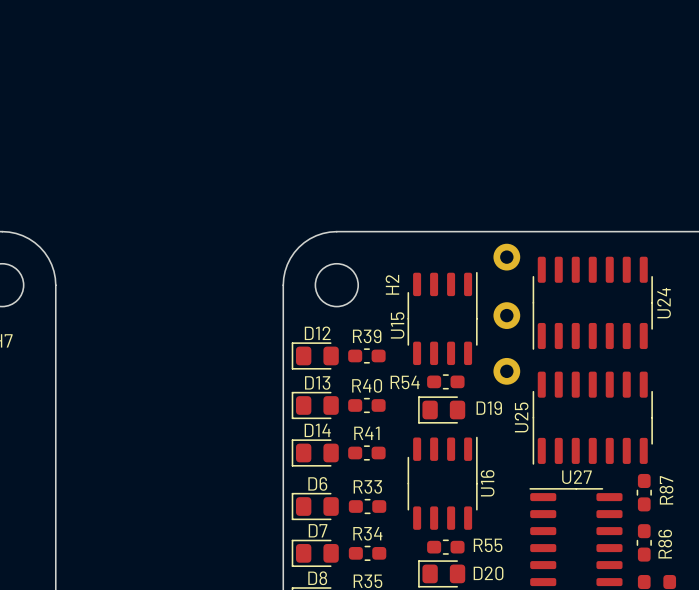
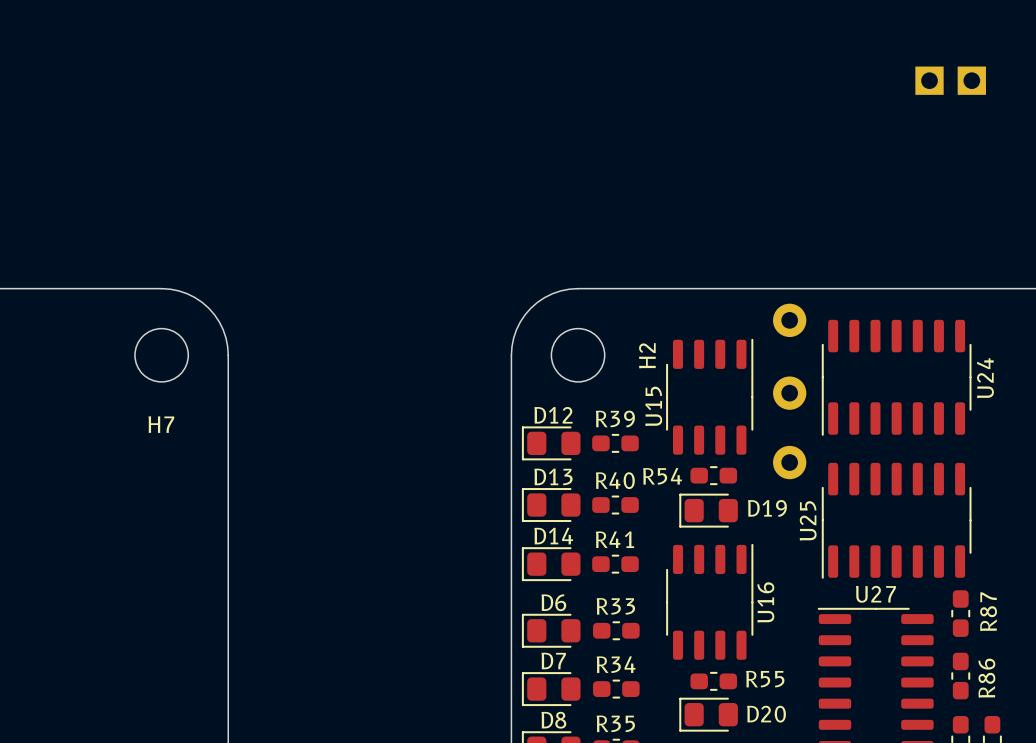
part: none -> (929, 80)
part: none -> (971, 80)

